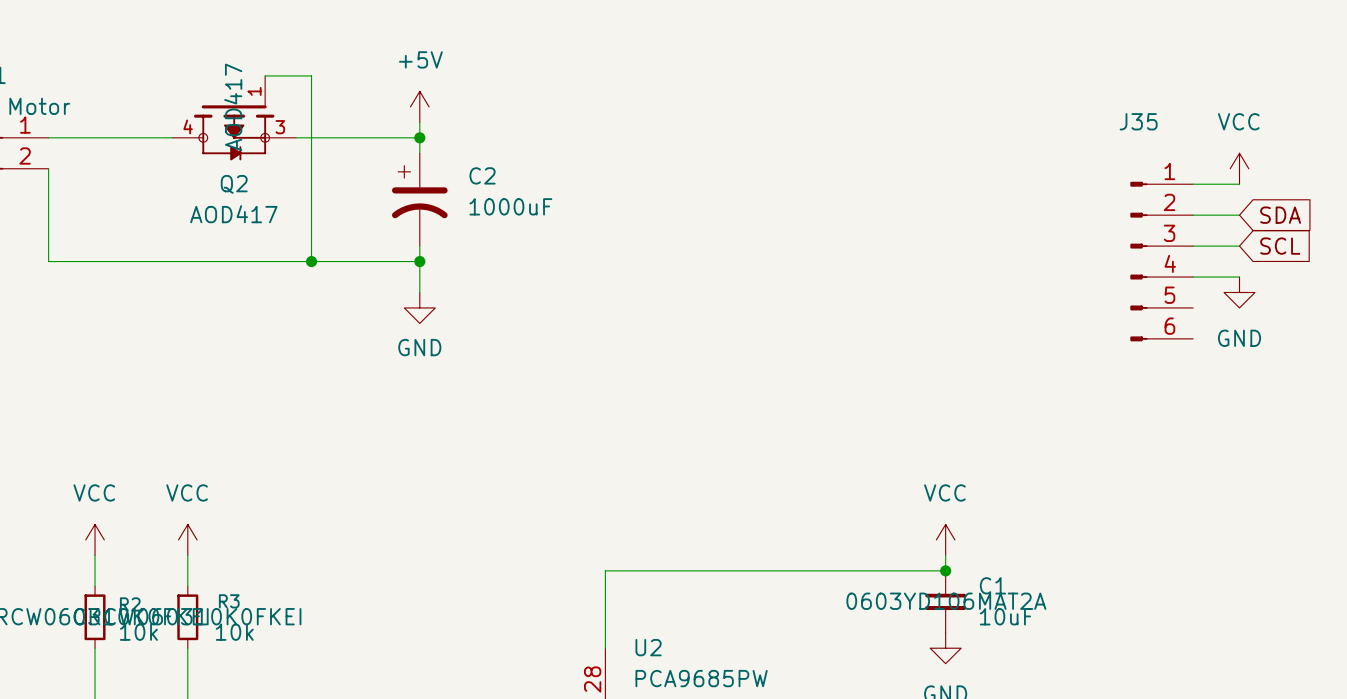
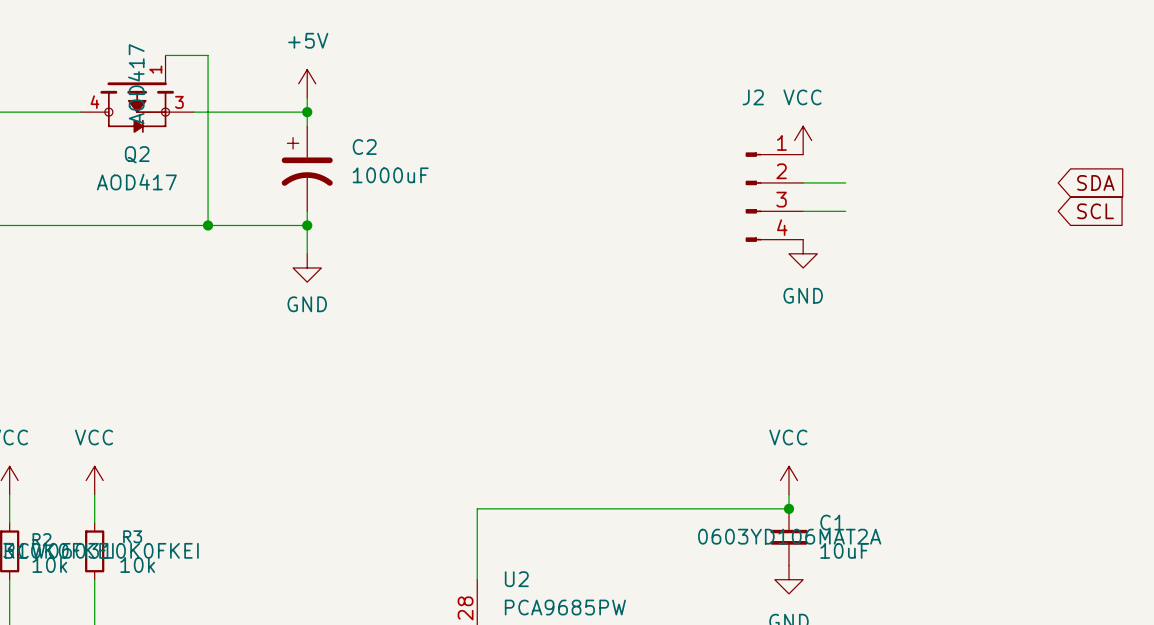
power symbol position: VCC (1239, 168) -> VCC (803, 140)
wire: (1193, 184) (1239, 184) -> none
wire: (1193, 215) (1239, 215) -> (803, 182) (845, 182)
J2: none -> (774, 197)
wire: (1193, 246) (1239, 246) -> (803, 211) (845, 211)
J35: (1161, 261) -> none
wire: (1193, 277) (1239, 277) -> none
power symbol position: GND (1239, 292) -> GND (803, 253)

